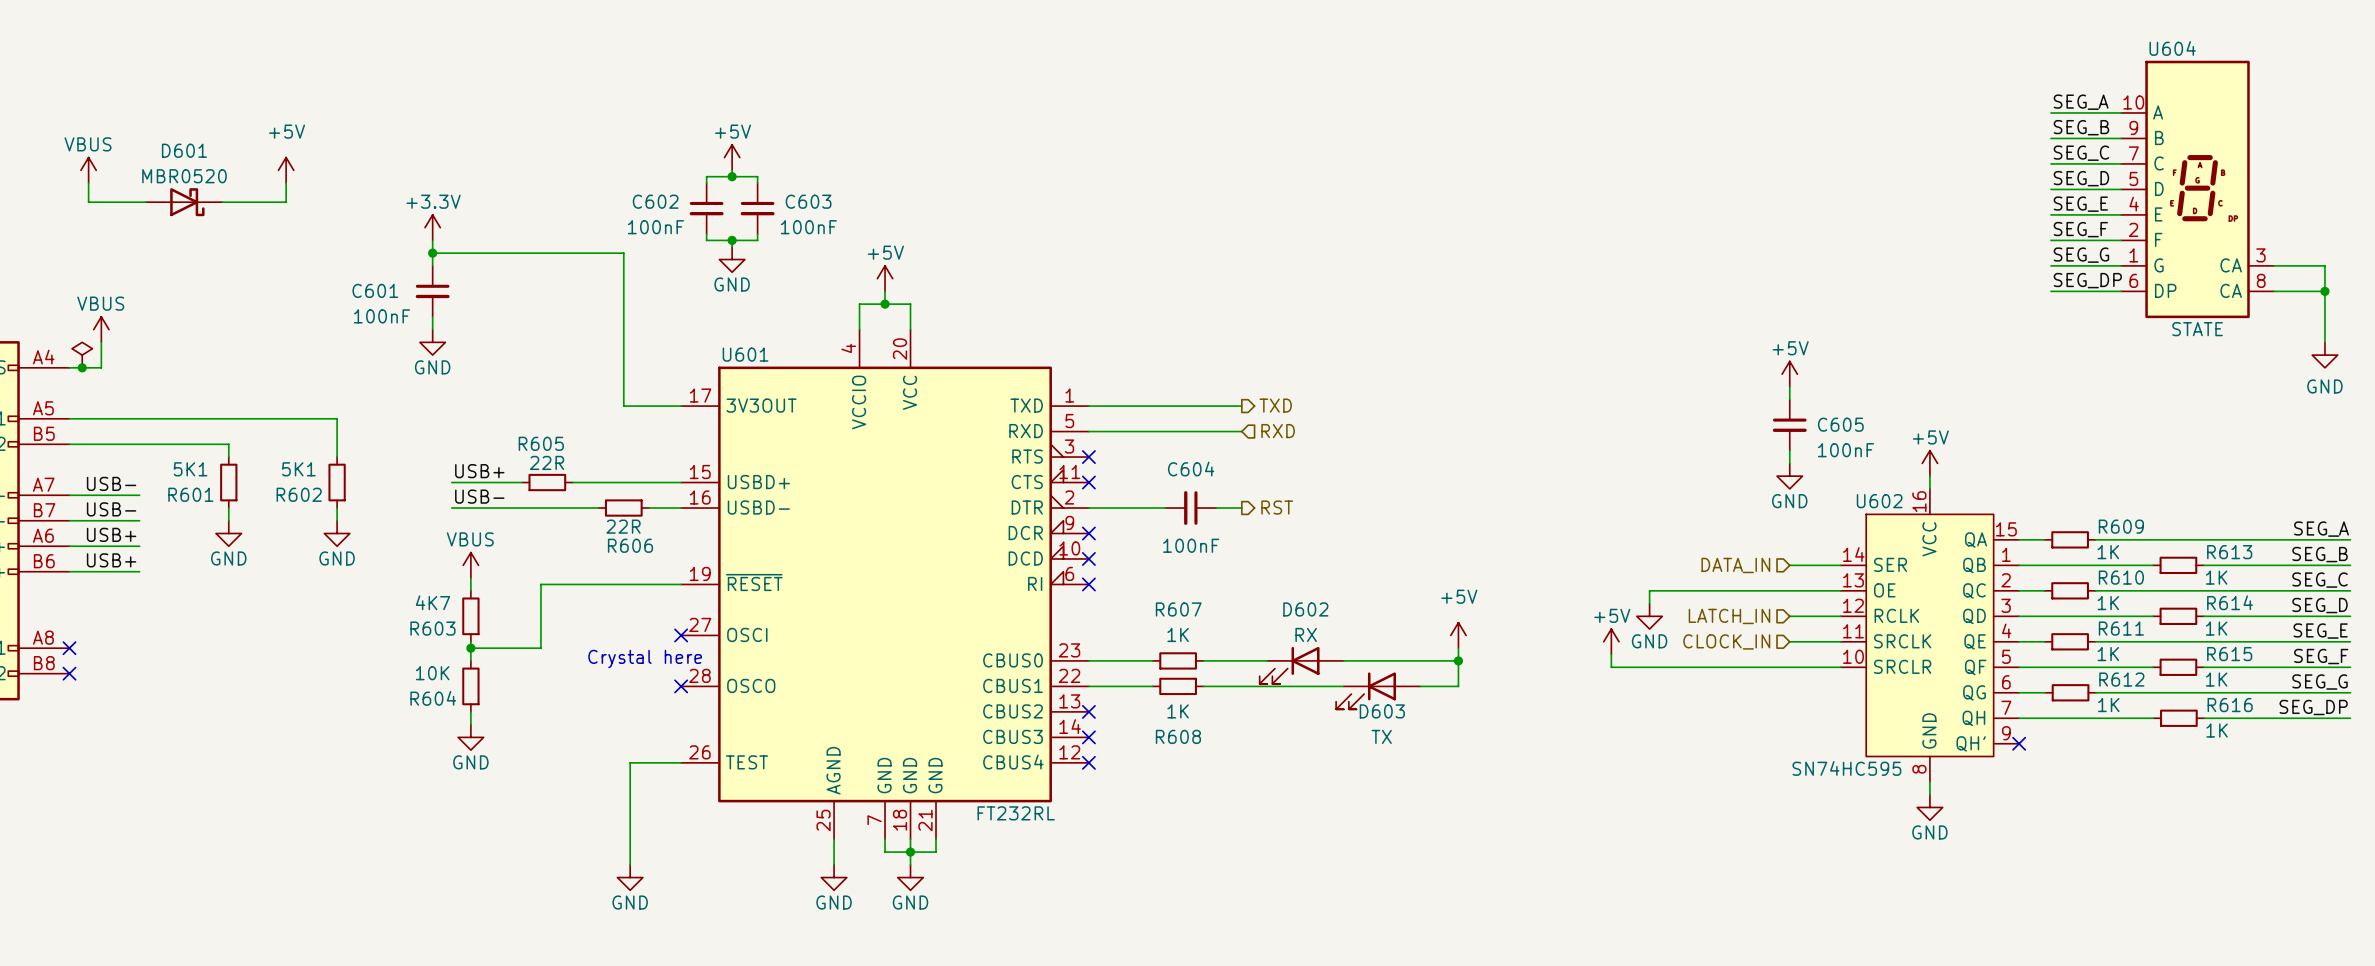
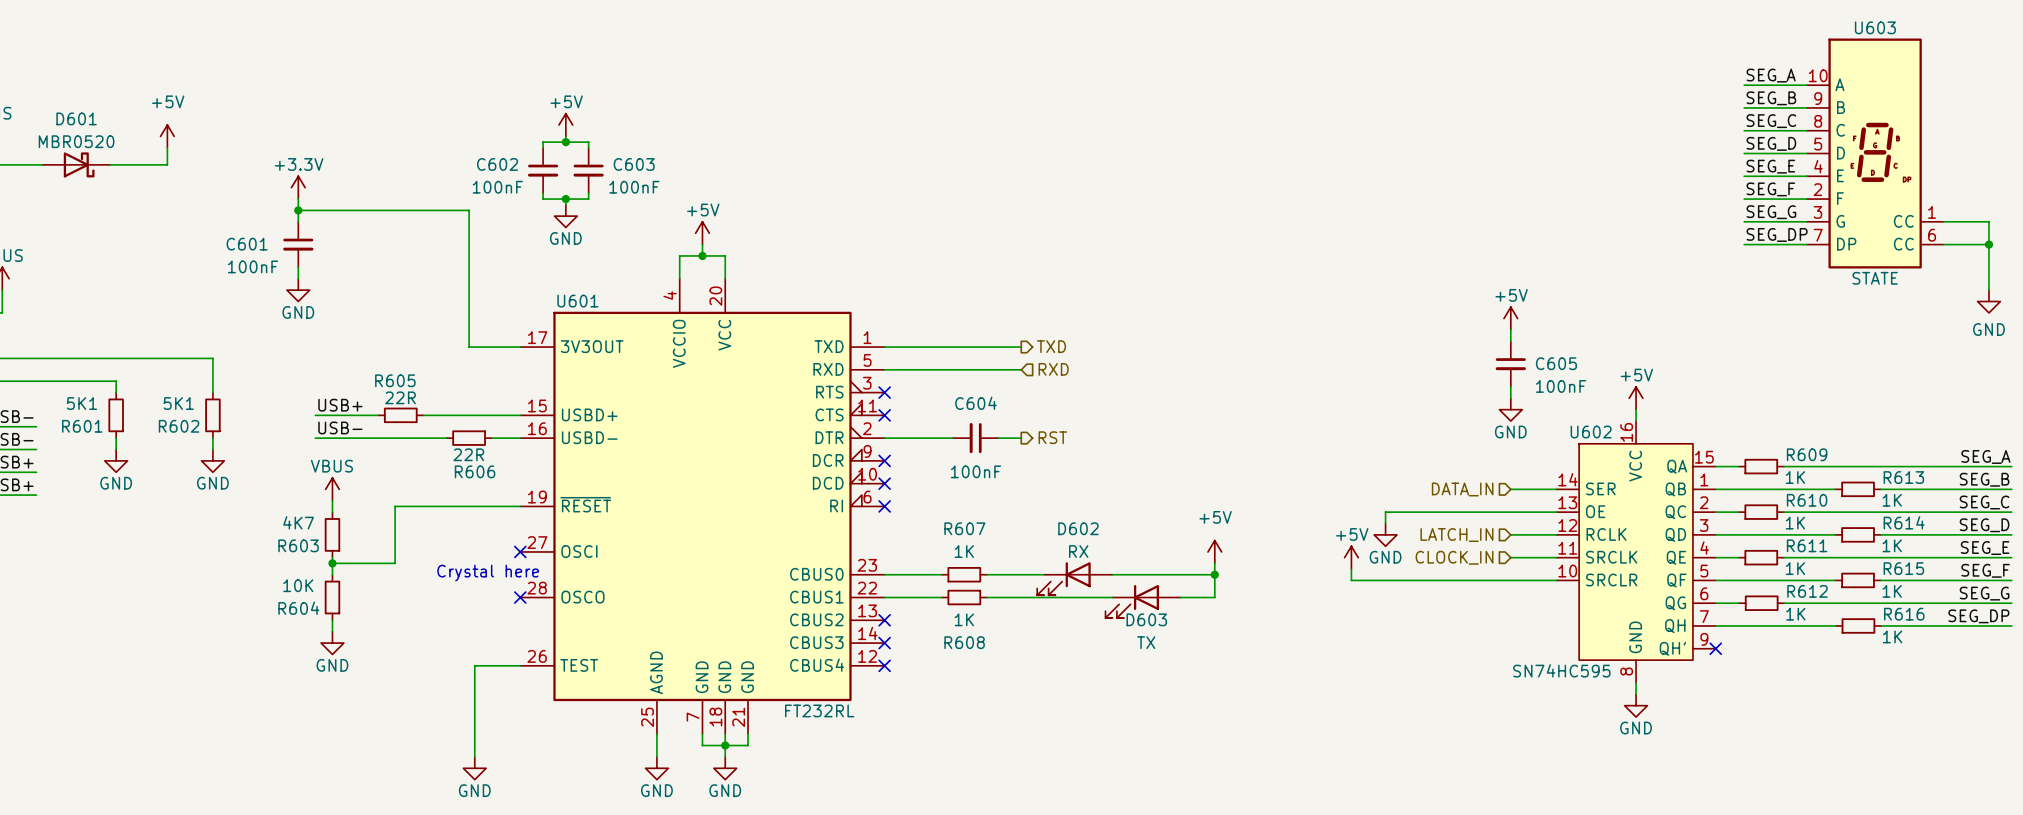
U604 name: U604 (2172, 48) -> U603 (1875, 27)
U604 pin number: 7 (2133, 153) -> 8 (1818, 121)
U604 pin number: 1 (2133, 255) -> 3 (1817, 212)
U604 pin number: 3 (2260, 255) -> 1 (1932, 212)
U604 pin name: CA (2231, 265) -> CC (1903, 221)
U604 pin number: 6 (2133, 280) -> 7 (1818, 235)
U604 pin number: 8 (2261, 280) -> 6 (1932, 235)
U604 pin name: CA (2231, 290) -> CC (1903, 244)

